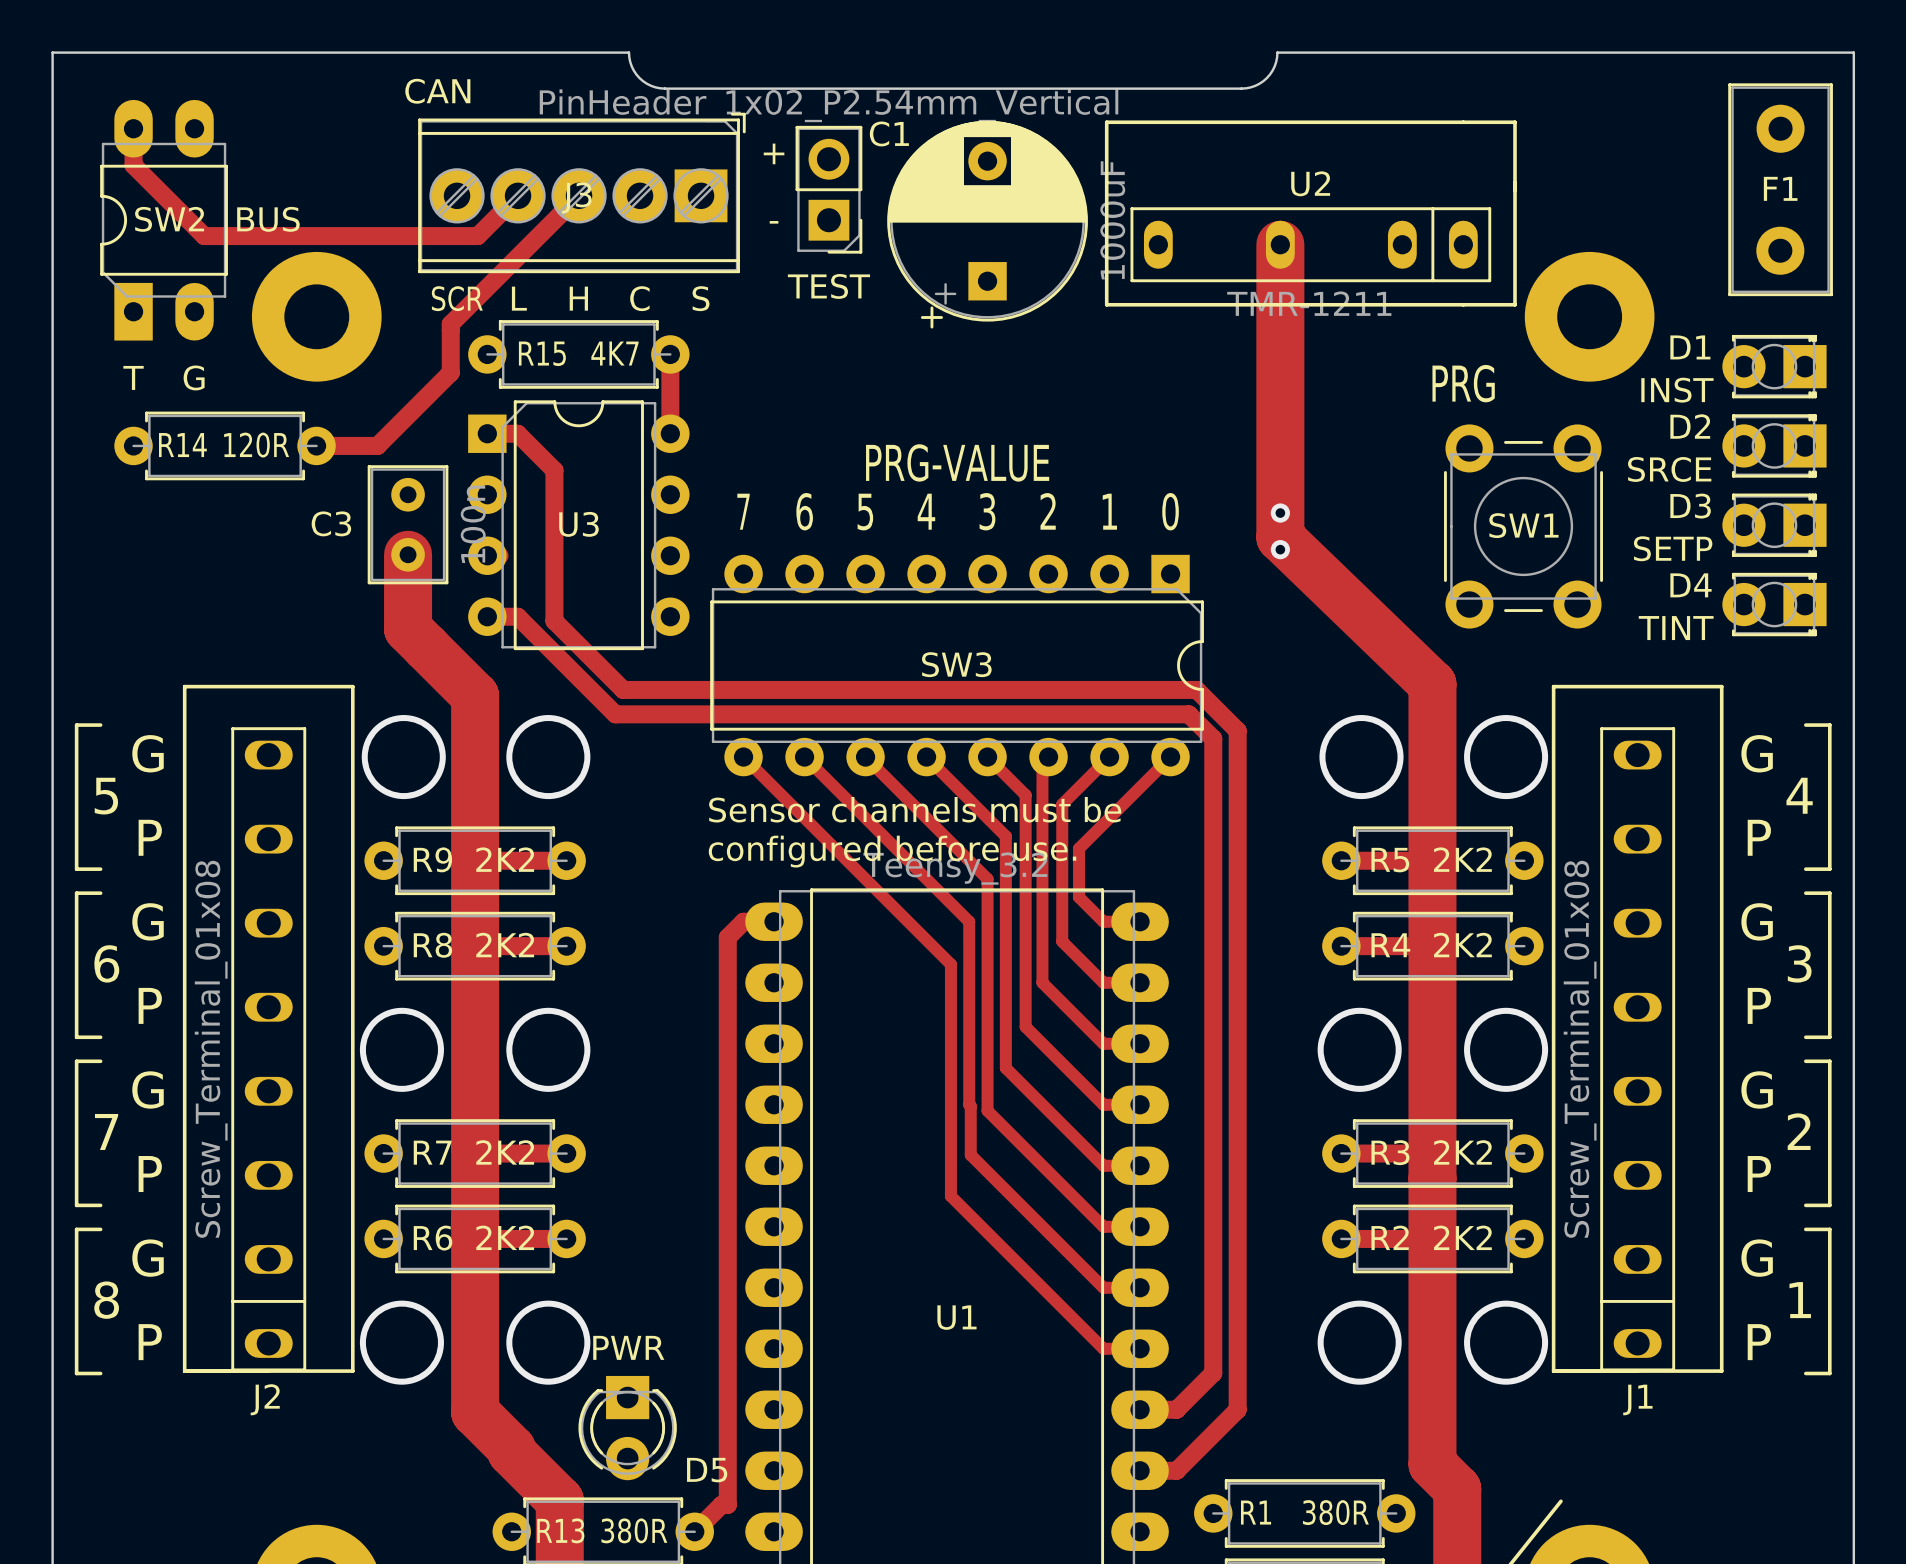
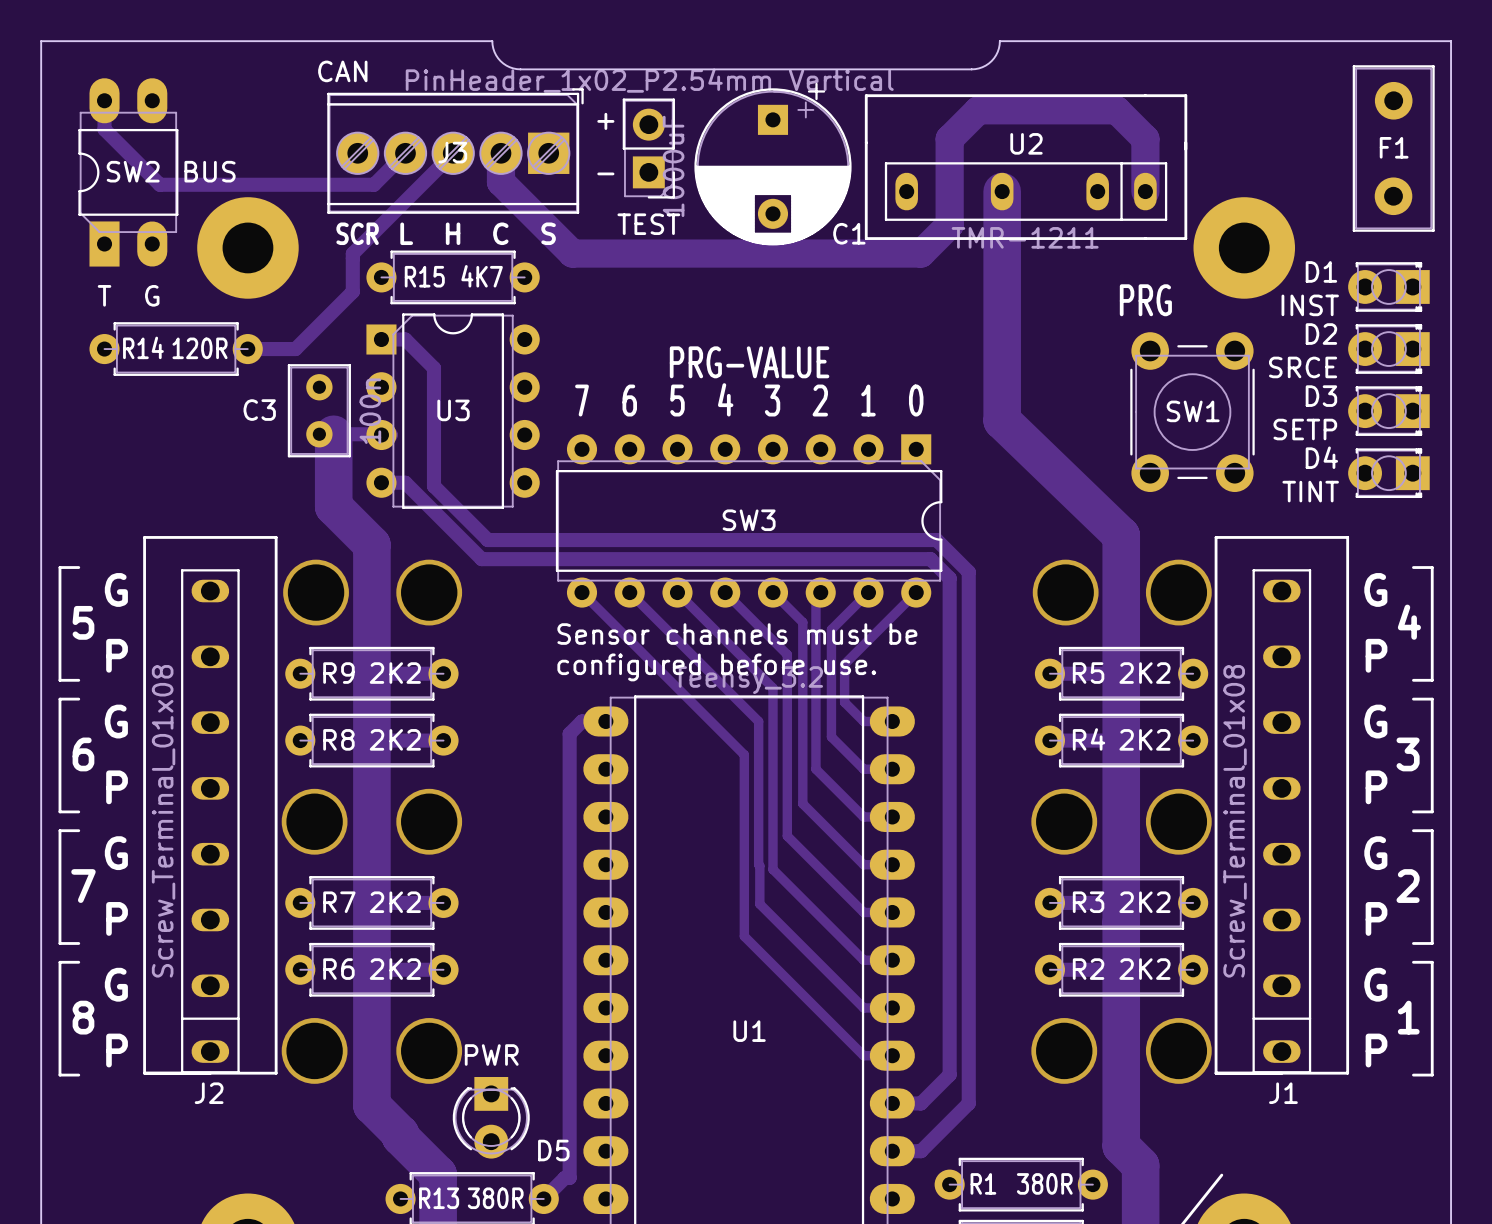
track: none -> (500, 153) (500, 182) (572, 253) (921, 253) (949, 224) (949, 138) (978, 110) (1116, 110) (1145, 138) (1145, 191)
C1 rotation: 0° (987, 224) -> 180° (772, 164)
track: (670, 354) (670, 433) -> none
via: (1280, 513) -> none
via: (1280, 549) -> none
track: (408, 554) (408, 628) (426, 647) -> (390, 434) (333, 434) (333, 506)

